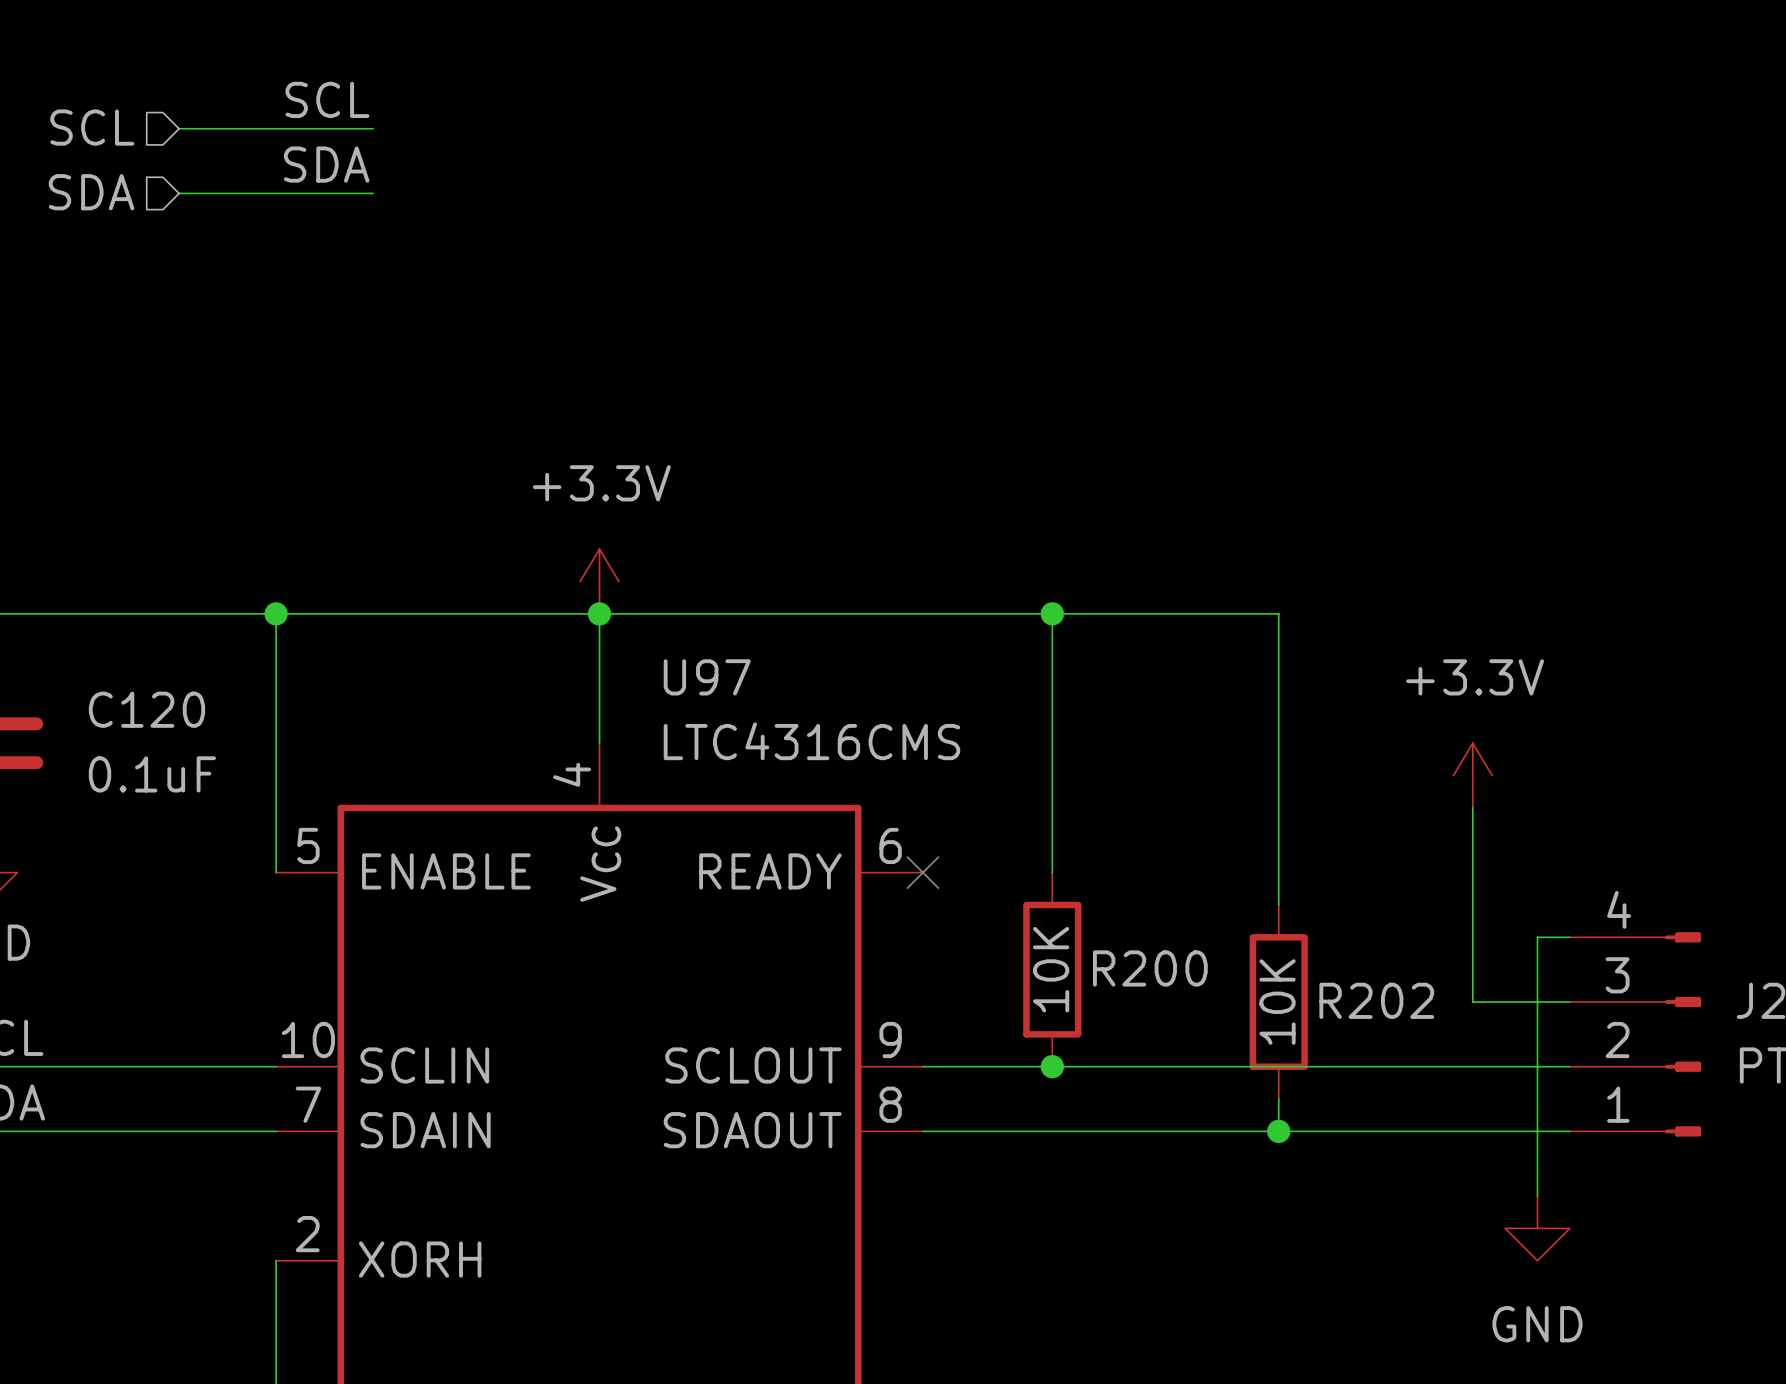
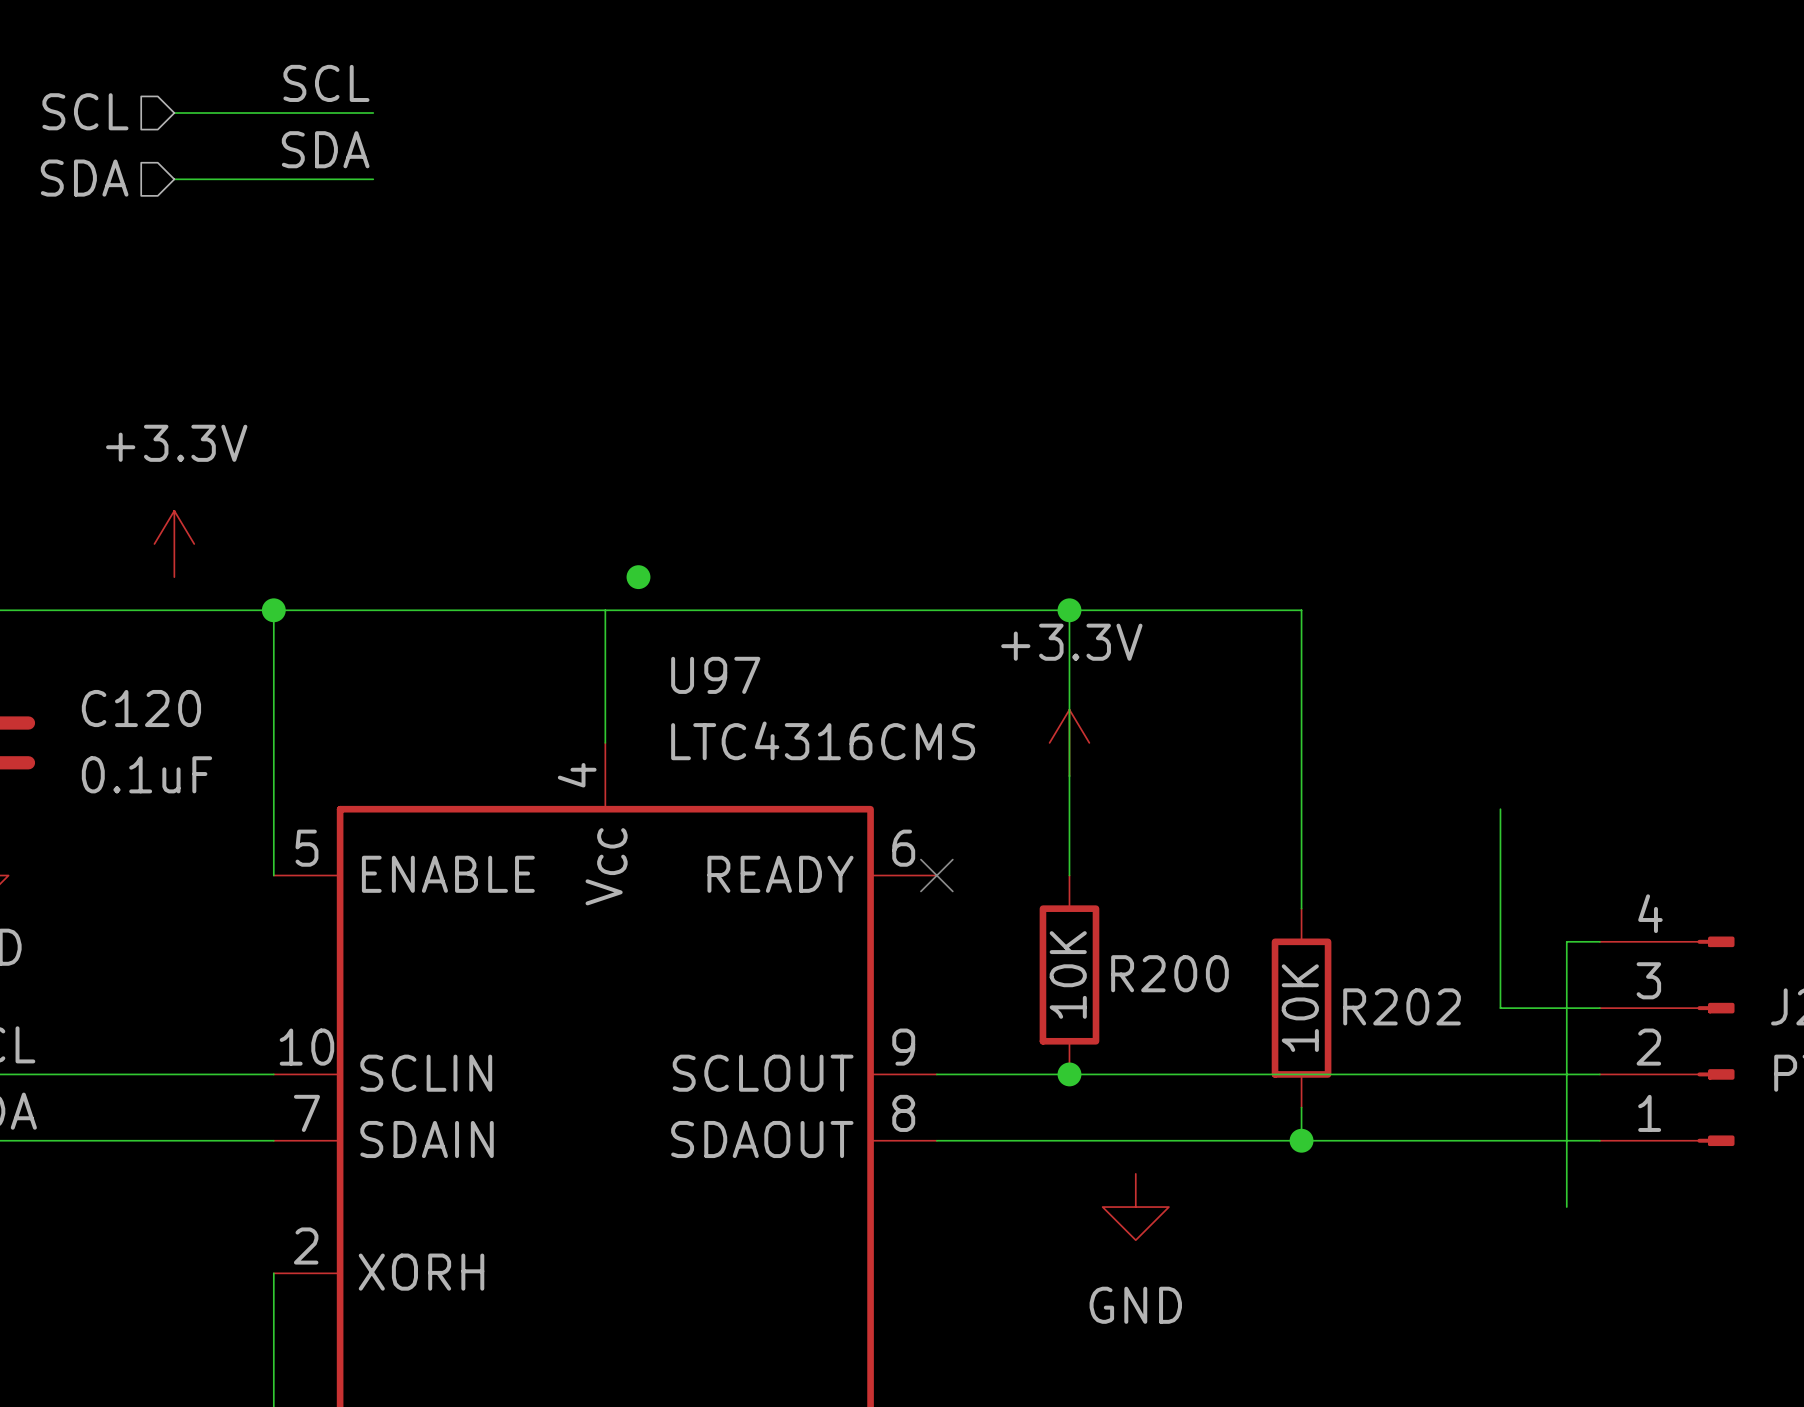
power symbol: none -> +3.3V (174, 543)
power symbol: +3.3V (599, 581) -> none
junction position: (599, 613) -> (638, 577)
power symbol: none -> +3.3V (1069, 742)
power symbol: +3.3V (1472, 775) -> none
power symbol: none -> GND (1135, 1207)
power symbol: GND (1537, 1228) -> none

